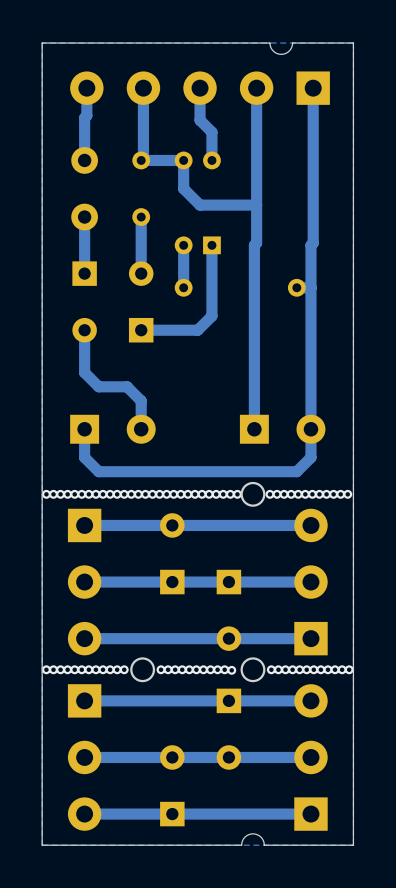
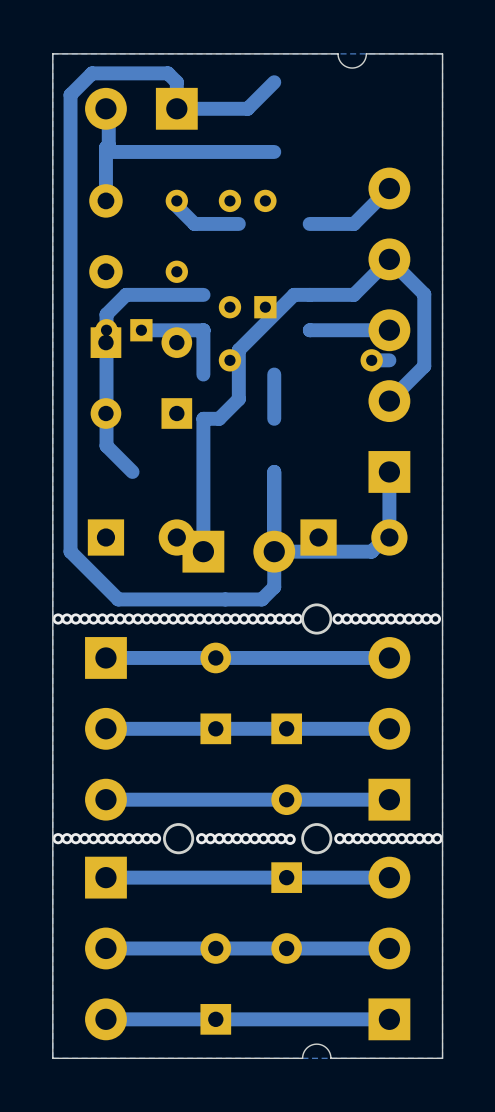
track: none -> (274, 82) (247, 108) (176, 108) (176, 82) (167, 73) (92, 73) (70, 94) (70, 551) (118, 599) (261, 599) (274, 587) (274, 471)
part: none -> (141, 108)
track: (200, 88) (200, 120) (211, 132) (211, 160) -> none
part rotation: 0° (200, 88) -> 90° clockwise (389, 330)
part position: (200, 88) -> (389, 330)
track: (256, 88) (254, 429) -> none
track: (313, 88) (310, 376) -> none
track: (141, 90) (143, 88) (143, 158) (141, 160) (183, 160) (183, 188) (200, 205) (256, 205) -> none
track: none -> (274, 151) (105, 153)
track: none -> (389, 188) (353, 223) (309, 223)
track: none -> (176, 206) (194, 223) (238, 223)
track: (84, 217) (84, 273) -> none
track: (141, 217) (141, 273) -> none
track: none -> (203, 294) (126, 294) (106, 314) (106, 445) (132, 471)
track: (183, 245) (183, 287) -> none
track: (211, 245) (211, 316) (197, 330) (141, 330) -> none
part: none -> (123, 330)
track: none -> (203, 330) (141, 330)
track: none -> (203, 330) (203, 374)
track: none -> (389, 330) (309, 330)
track: none -> (274, 374) (274, 418)
track: none -> (389, 401) (424, 366) (424, 294) (389, 259) (353, 294) (294, 294) (238, 350) (238, 399) (219, 418) (203, 418) (203, 551)
track: (84, 330) (84, 372) (98, 386) (127, 386) (141, 400) (141, 429) -> none
track: (310, 426) (310, 457) (296, 471) (98, 471) (84, 457) (84, 429) -> (389, 533) (371, 551) (274, 551)
part: none -> (238, 551)

